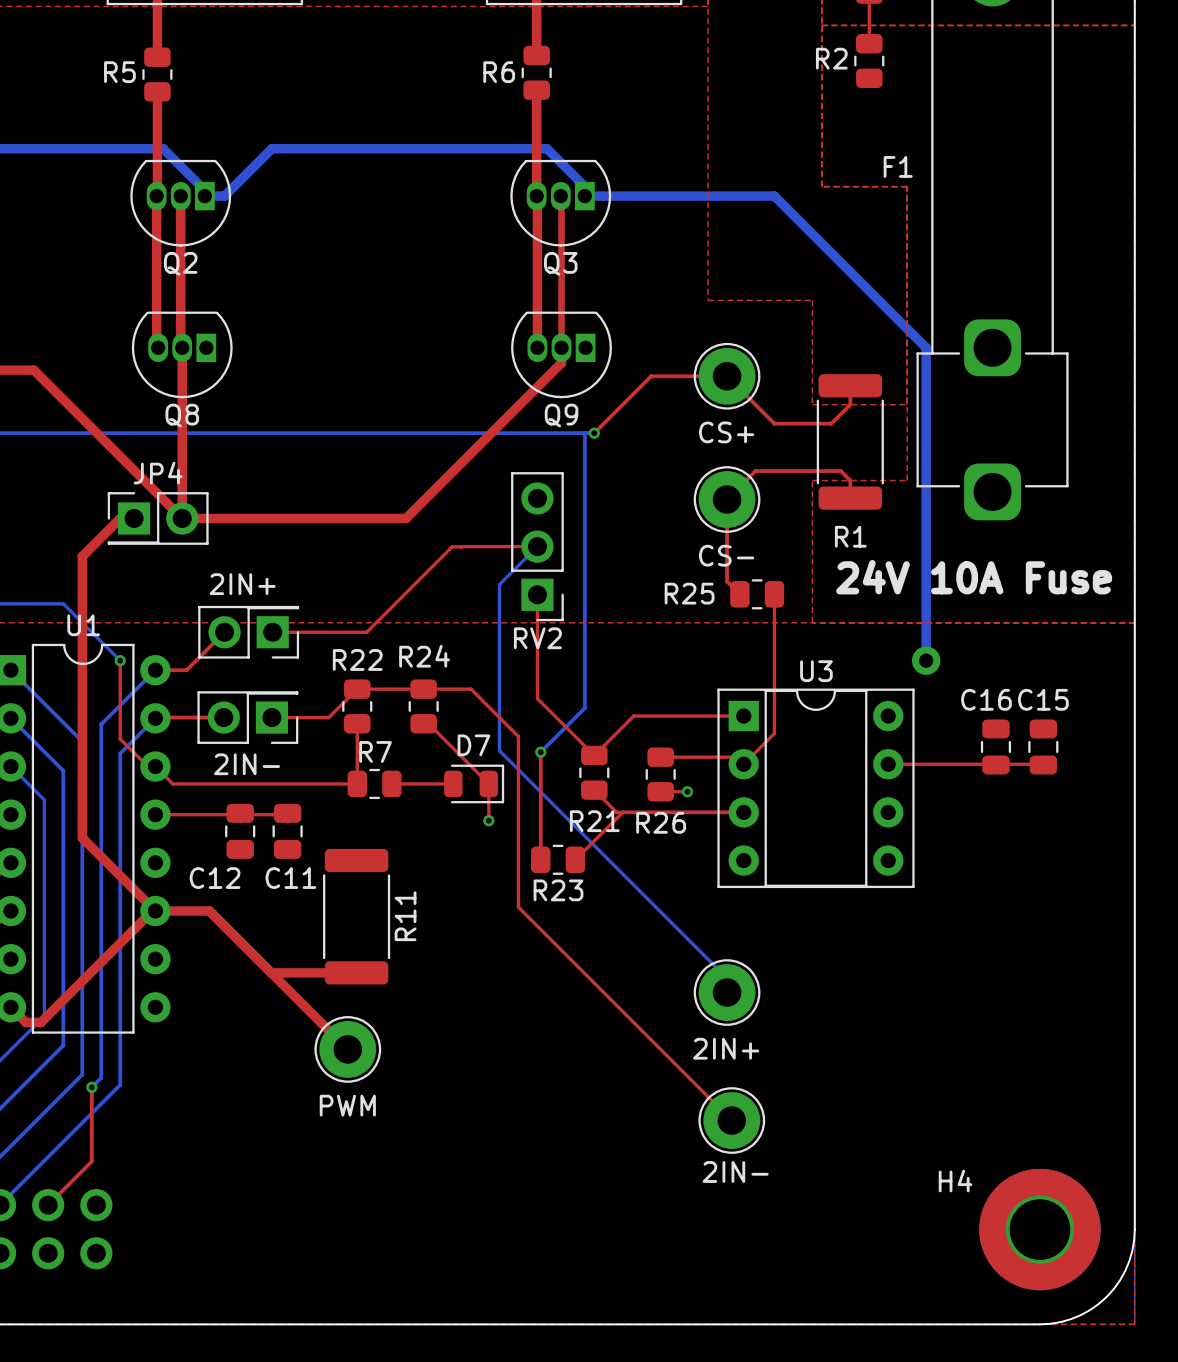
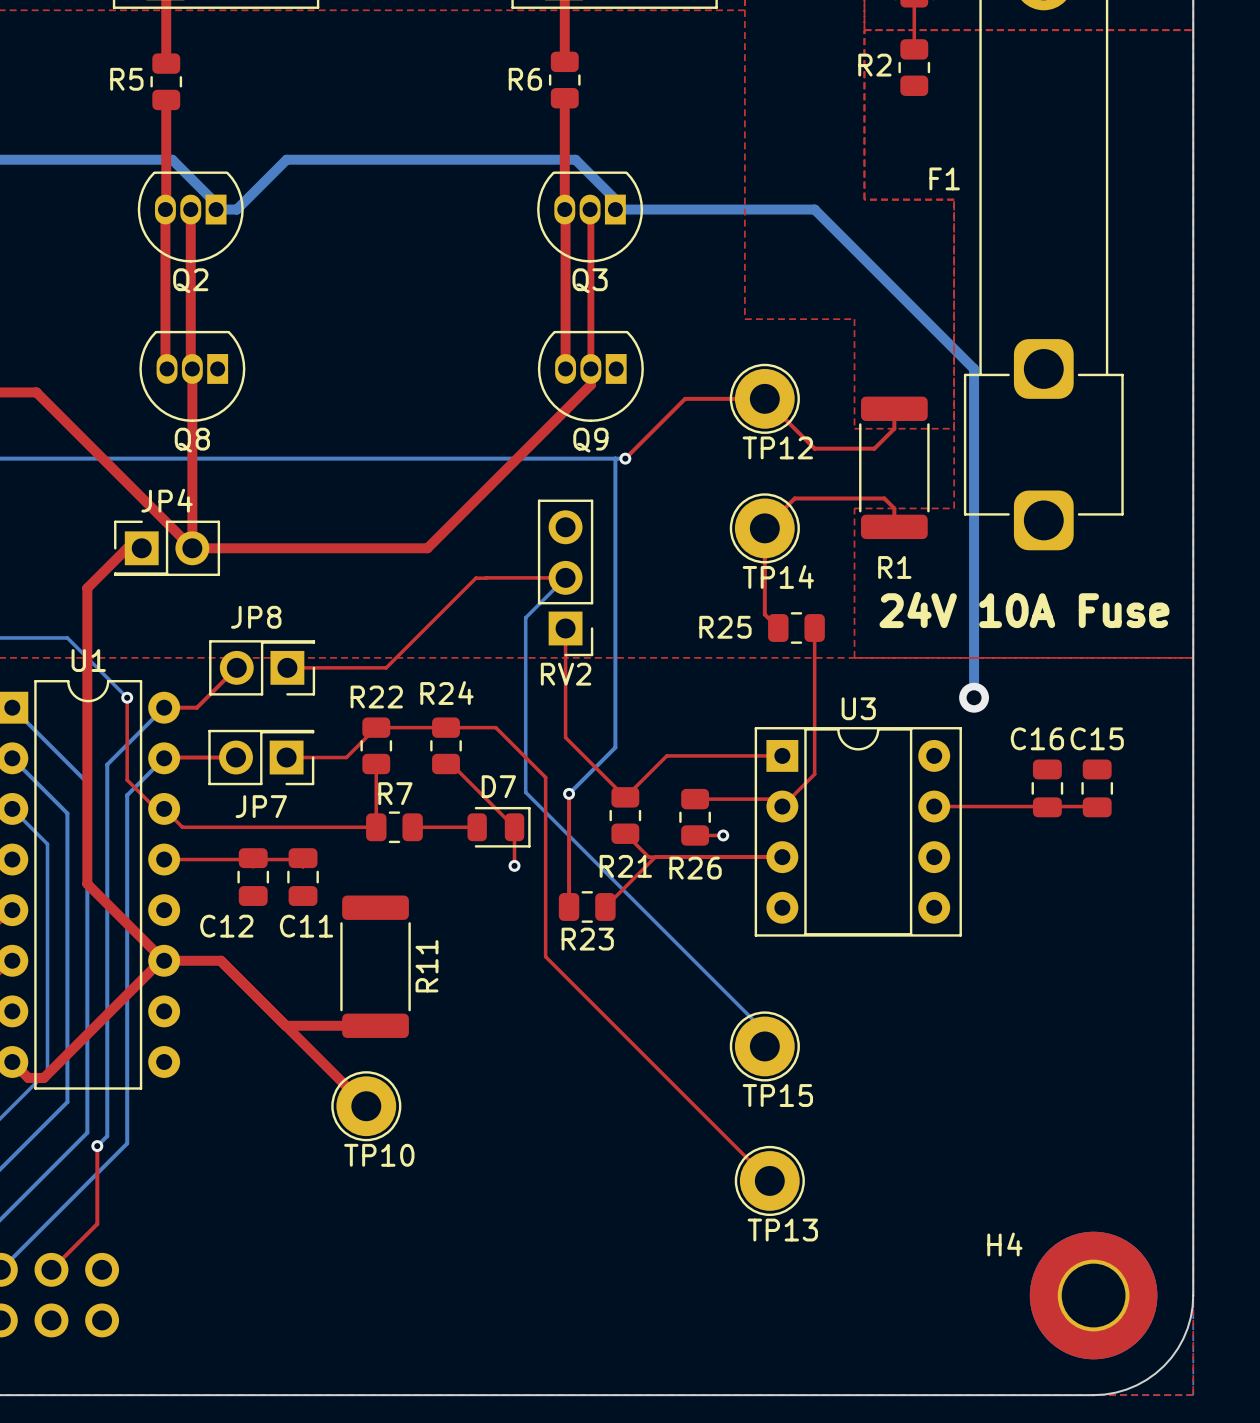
CS+ name: CS+ (726, 432) -> TP12 (777, 447)
CS- name: CS- (726, 555) -> TP14 (778, 576)
2IN+ name: 2IN+ (242, 584) -> JP8 (256, 617)
2IN- name: 2IN- (246, 764) -> JP7 (261, 806)
2IN+ name: 2IN+ (726, 1048) -> TP15 (777, 1095)
PWM name: PWM (347, 1105) -> TP10 (379, 1155)
2IN- name: 2IN- (735, 1171) -> TP13 (782, 1230)

